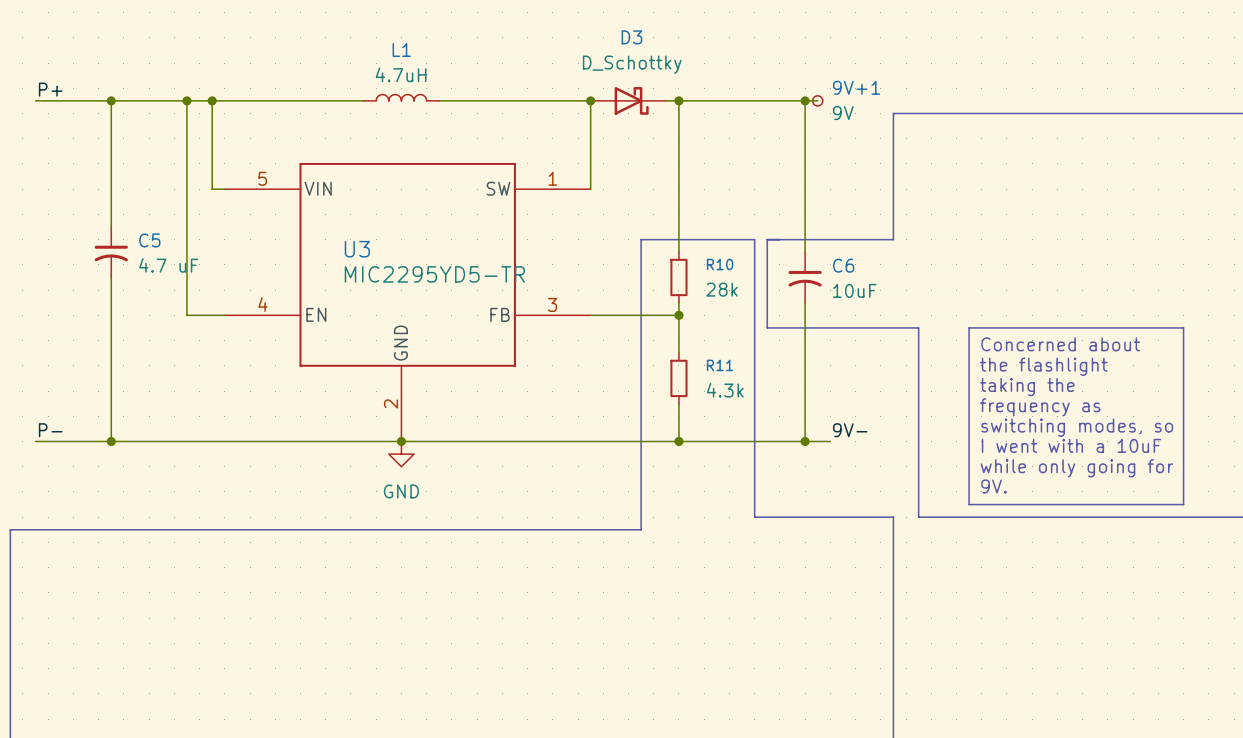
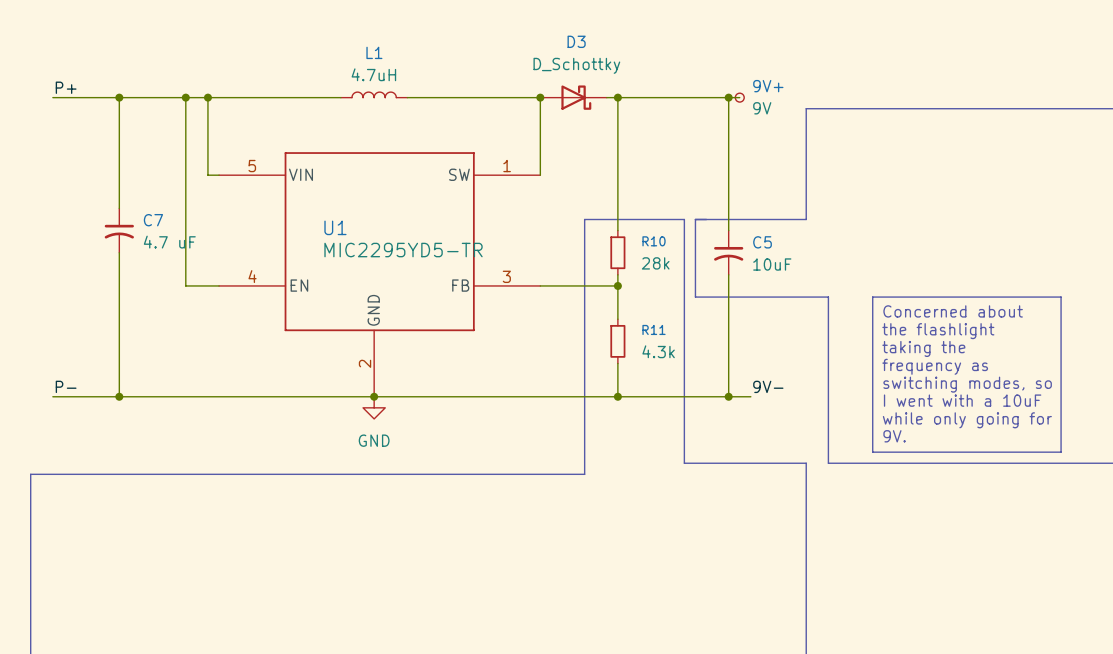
9V+1 name: 9V+1 (856, 87) -> 9V+ (768, 86)
C5 name: C5 (149, 240) -> C7 (153, 220)
U3 name: U3 (357, 249) -> U1 (335, 227)
C6 name: C6 (843, 265) -> C5 (762, 242)

